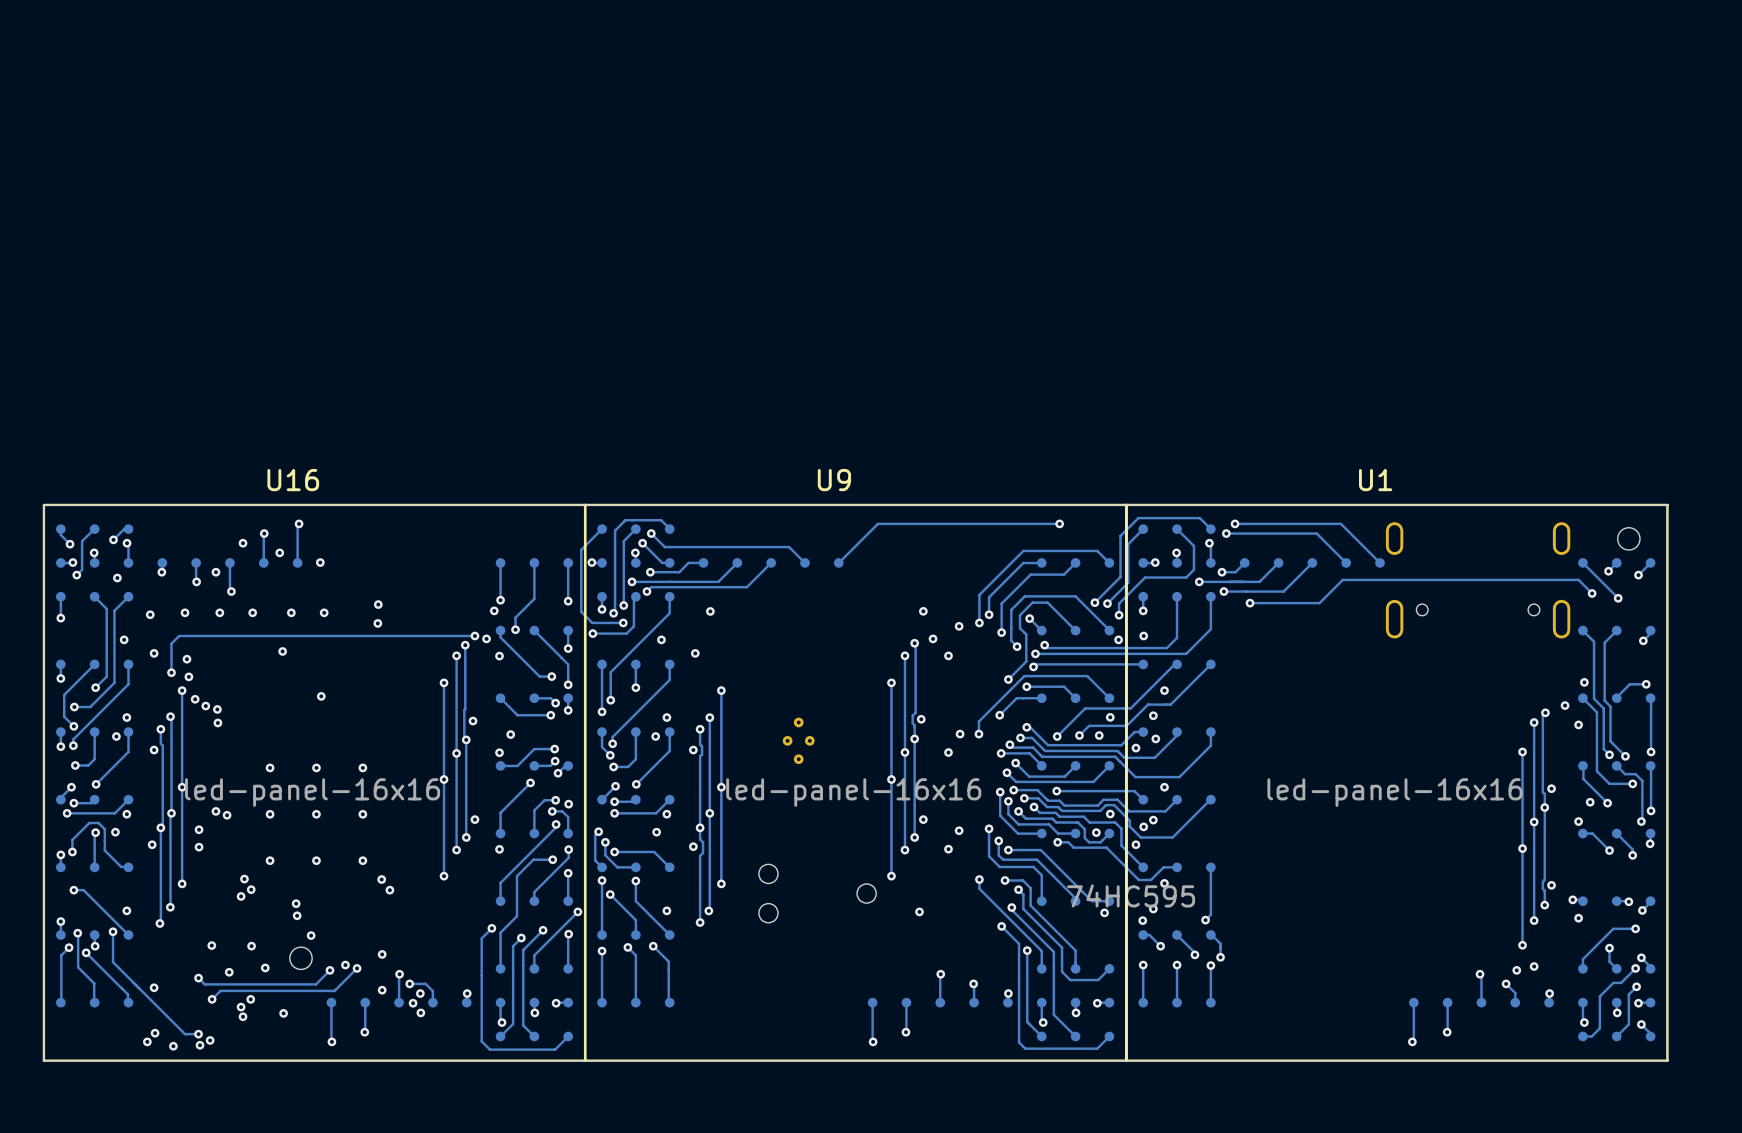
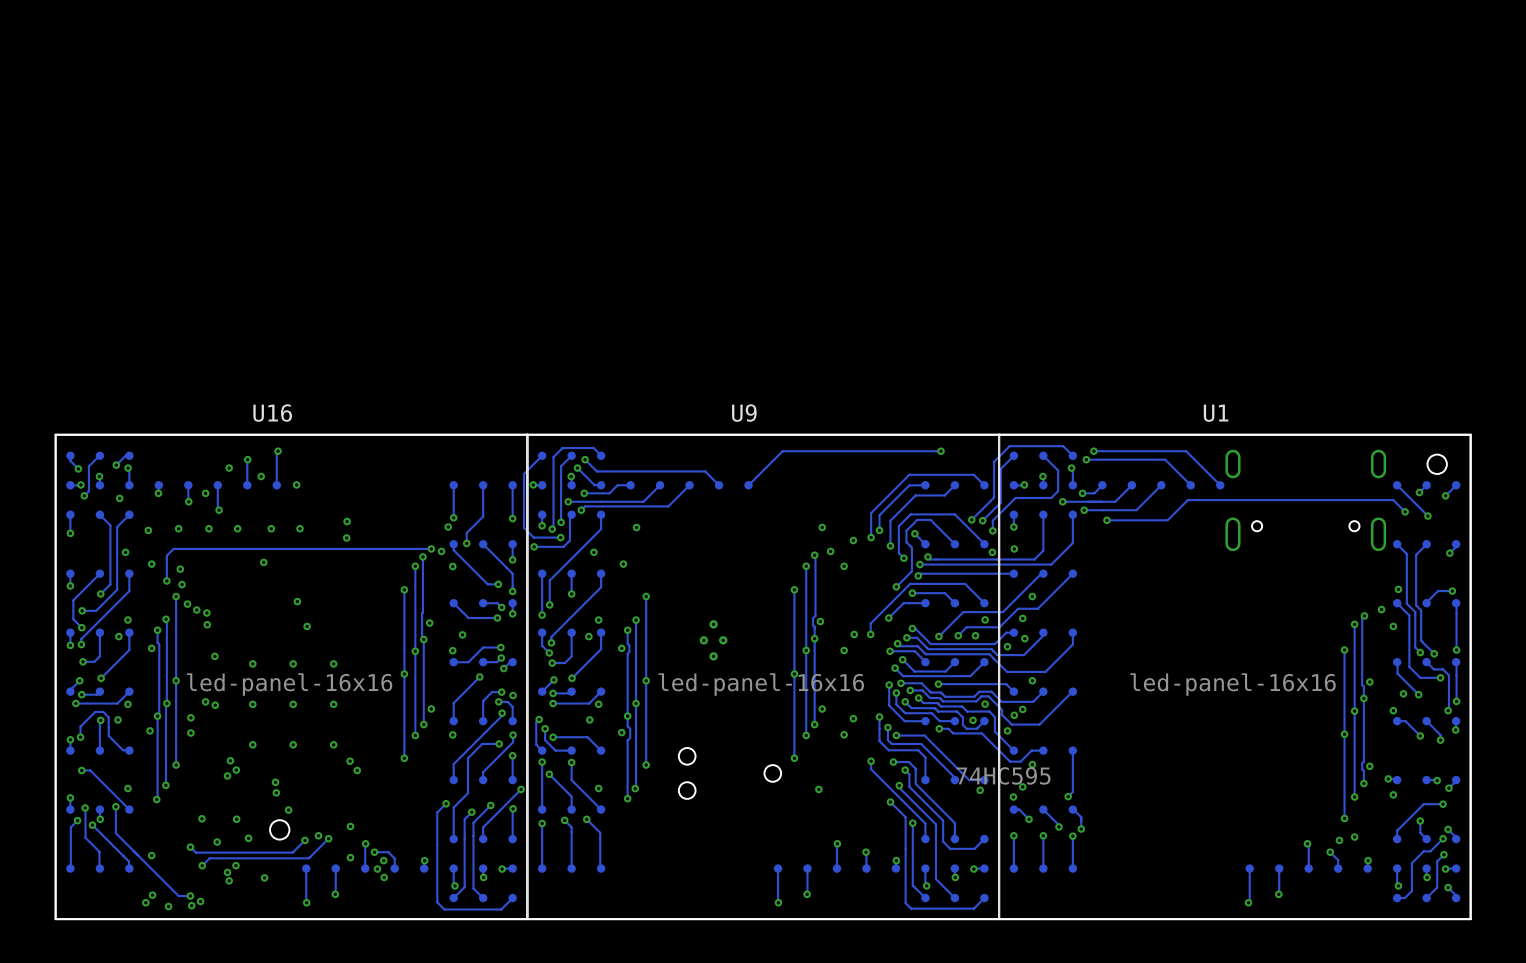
via: none -> (307, 626)
via: none -> (214, 656)

